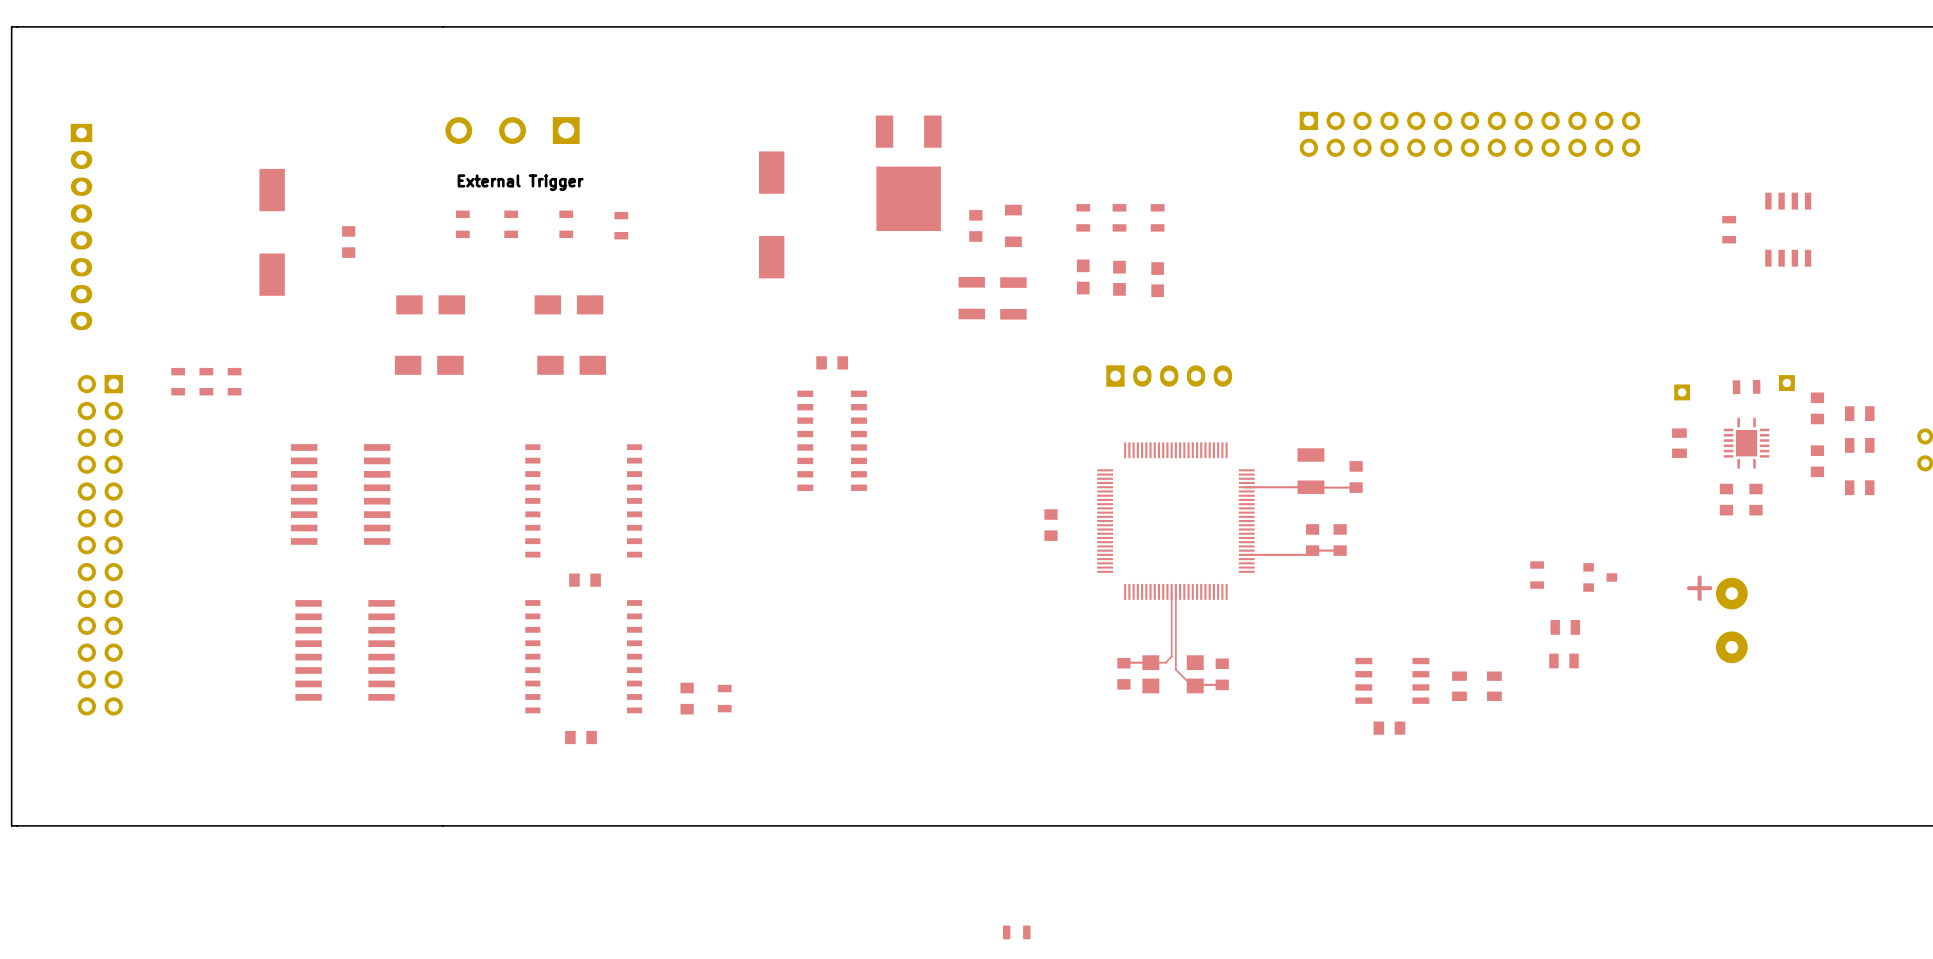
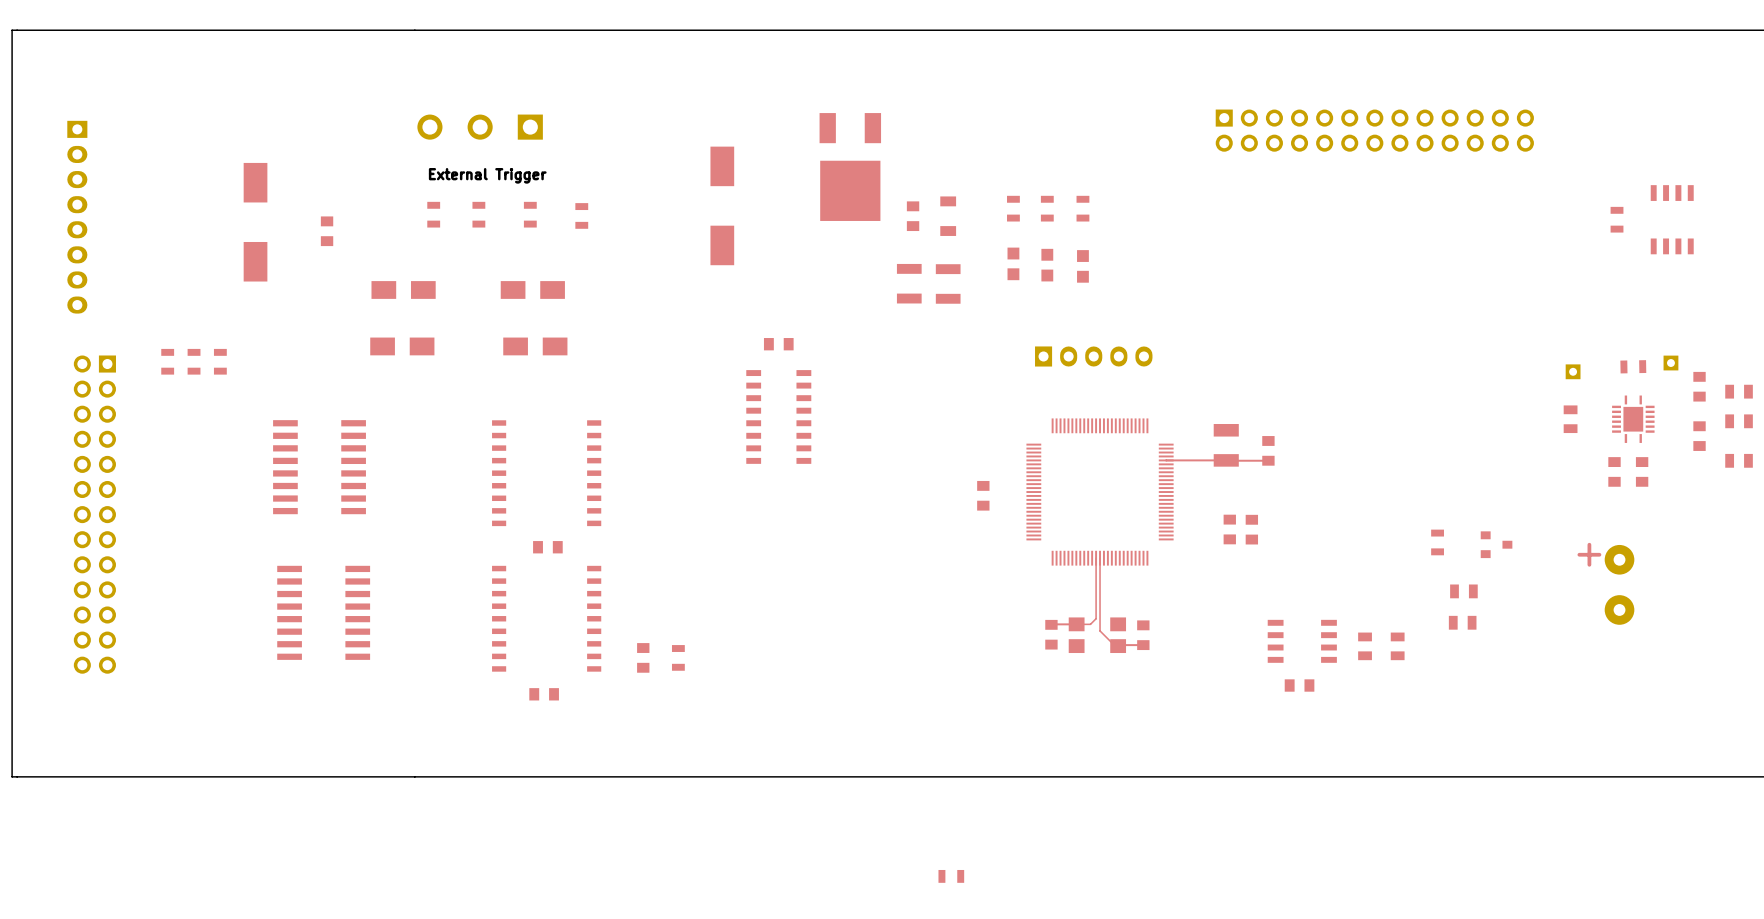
part: (1312, 540) -> none
part: (1340, 540) -> none
top track: (1340, 550) (1312, 550) (1308, 554) (1246, 554) -> none
part: none -> (1229, 529)
part: none -> (1251, 529)

